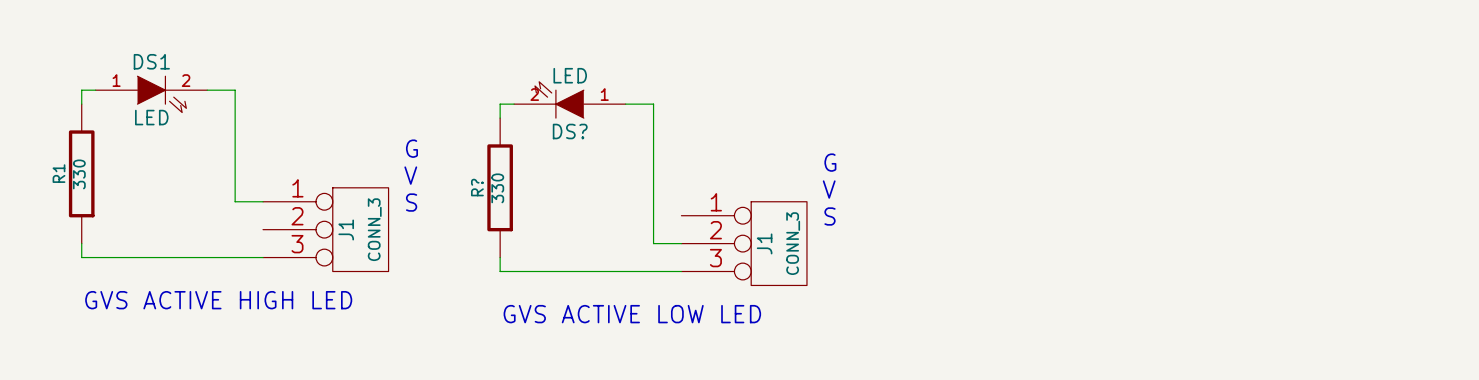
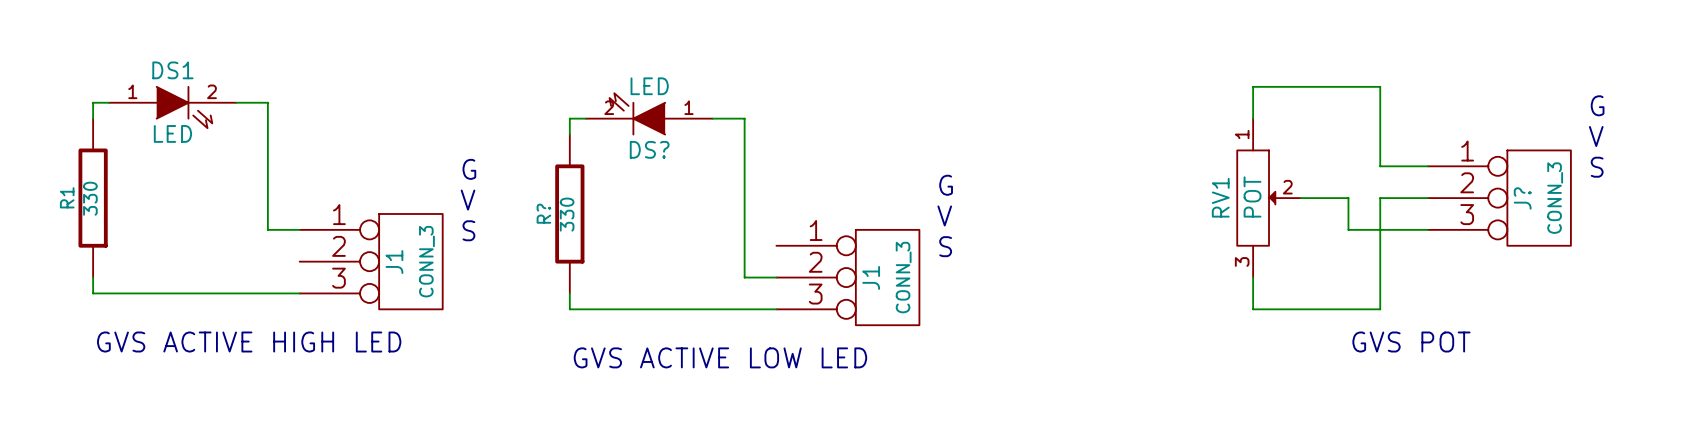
text: none -> G (1597, 105)
wire: none -> (1253, 118) (1253, 86) (1380, 86) (1380, 166) (1427, 166)
text: none -> V (1596, 136)
text: none -> S (1597, 167)
RV1: none -> POT (1269, 198)
wire: none -> (1300, 198) (1348, 198) (1348, 229) (1427, 229)
wire: none -> (1427, 198) (1380, 198) (1380, 309) (1253, 309) (1253, 277)
J?: none -> CONN_3 (1499, 198)
text: none -> GVS POT (1411, 342)

